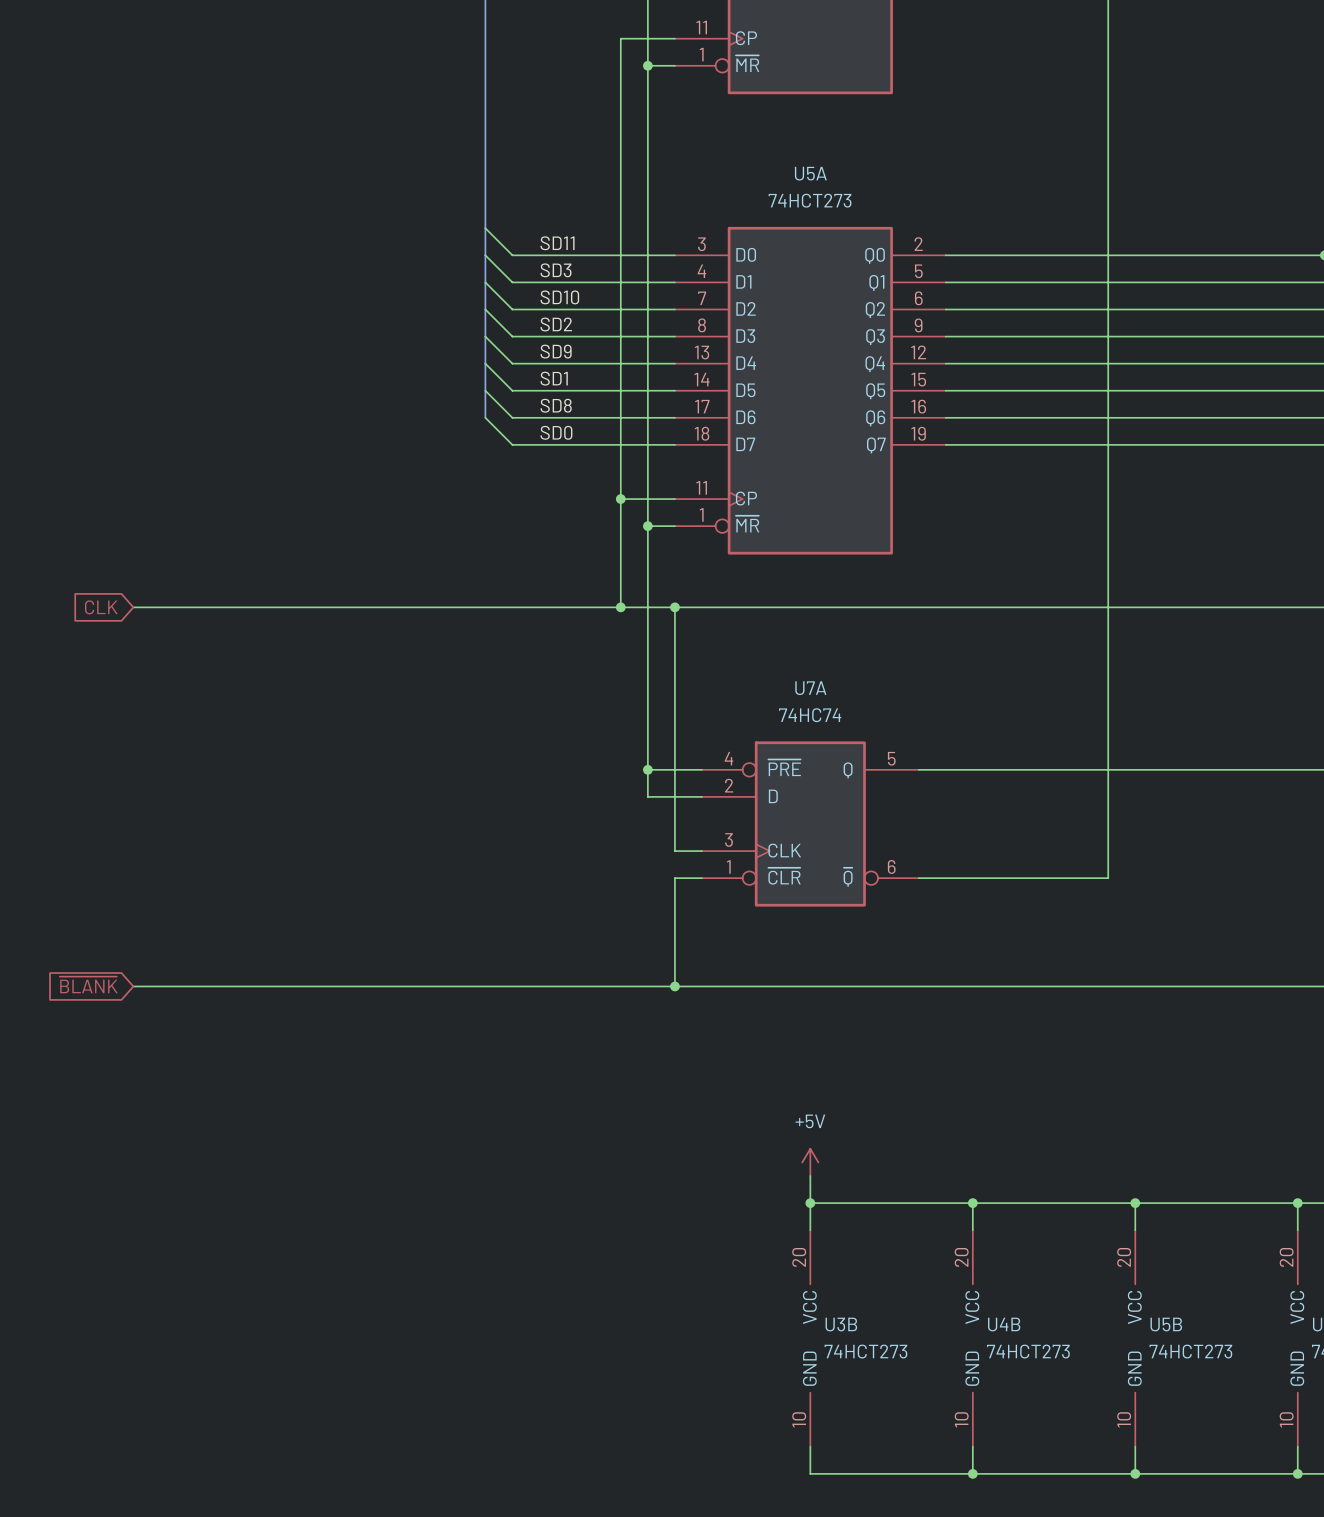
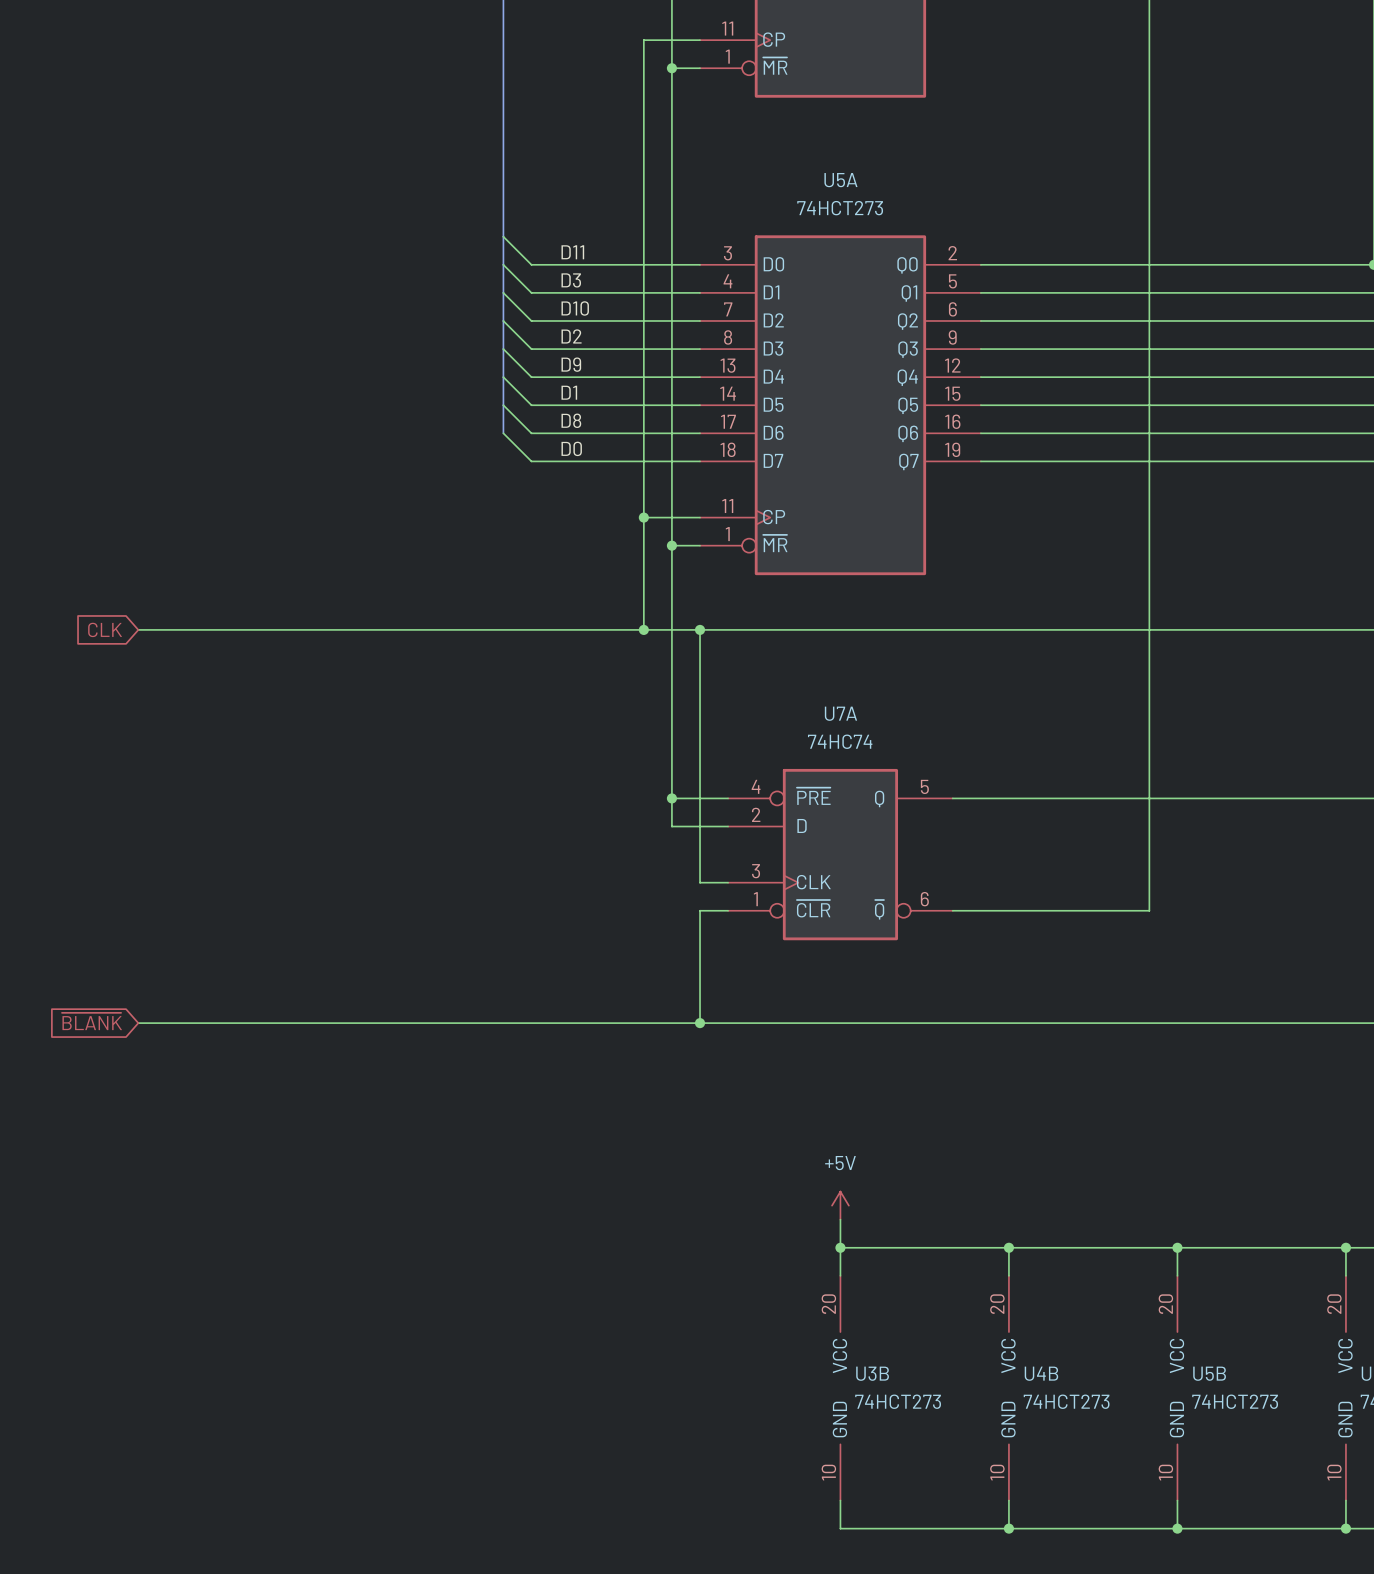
label: SD11 (557, 243) -> D11 (572, 252)
label: SD3 (556, 270) -> D3 (571, 280)
label: SD10 (559, 297) -> D10 (575, 308)
label: SD2 (556, 324) -> D2 (571, 336)
label: SD9 (556, 351) -> D9 (571, 364)
label: SD1 (554, 378) -> D1 (569, 392)
label: SD8 (556, 405) -> D8 (571, 420)
label: SD0 (556, 432) -> D0 (571, 448)

